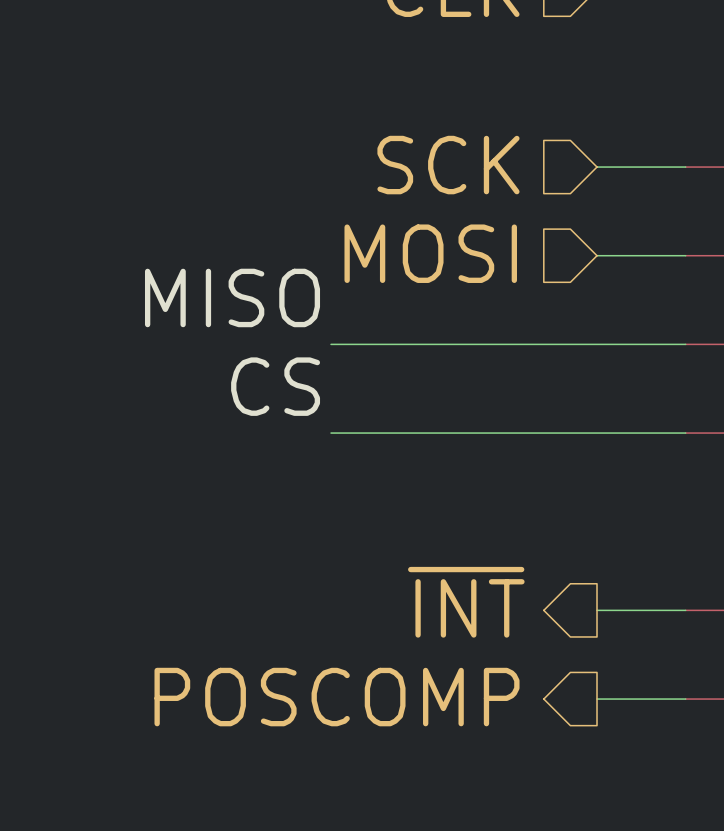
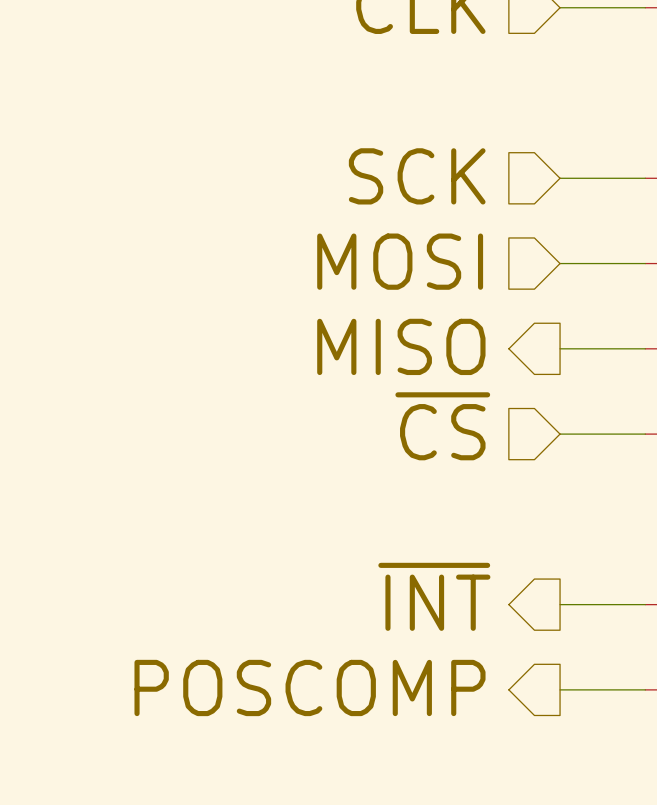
label: MISO (232, 297) -> none
hierarchical label: none -> MISO (401, 346)
wire: (331, 344) (597, 344) -> none
label: CS (275, 386) -> none
hierarchical label: none -> ~{CS} (442, 426)
wire: (331, 433) (597, 433) -> none

